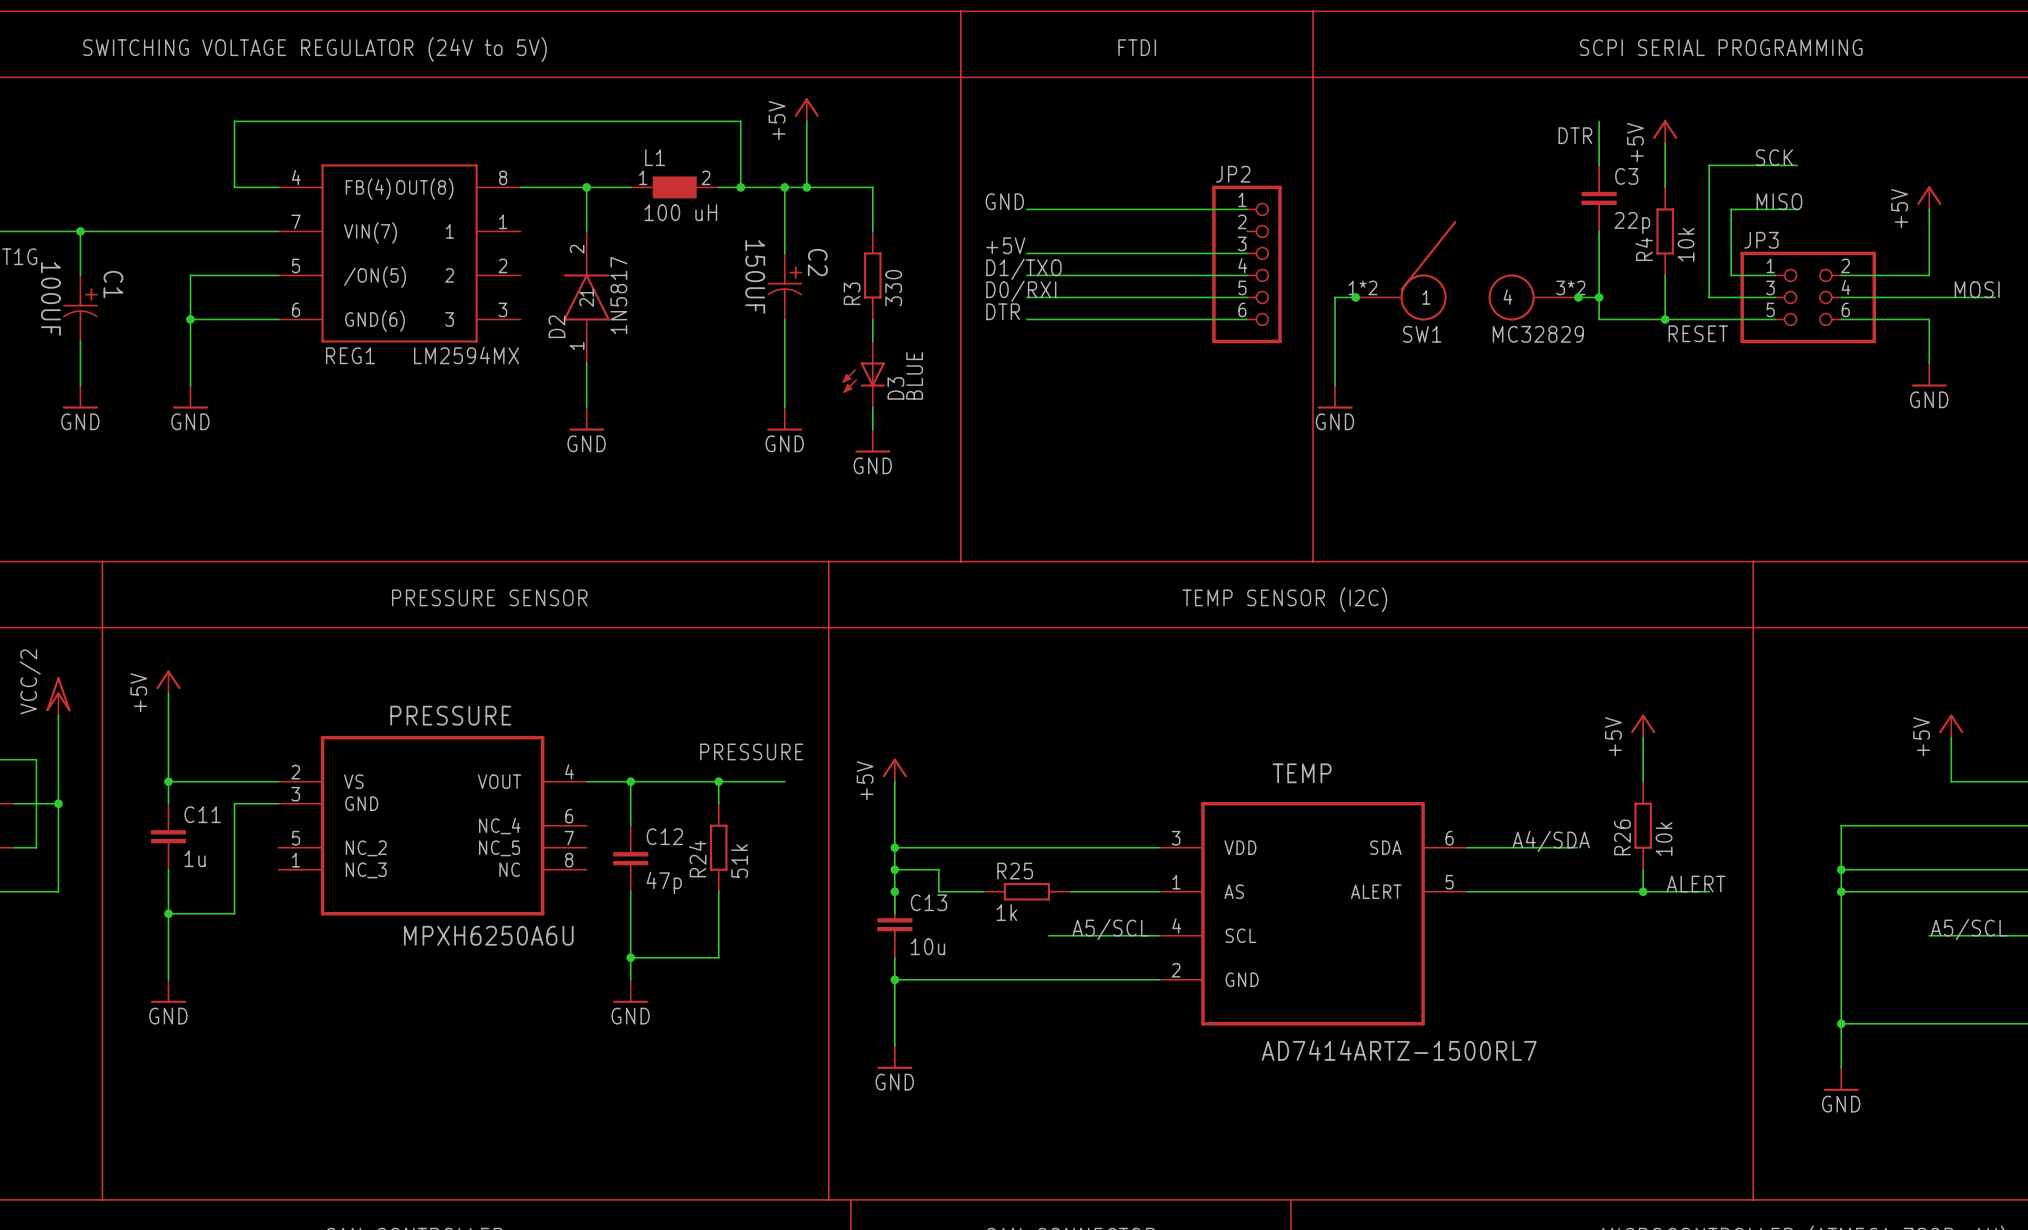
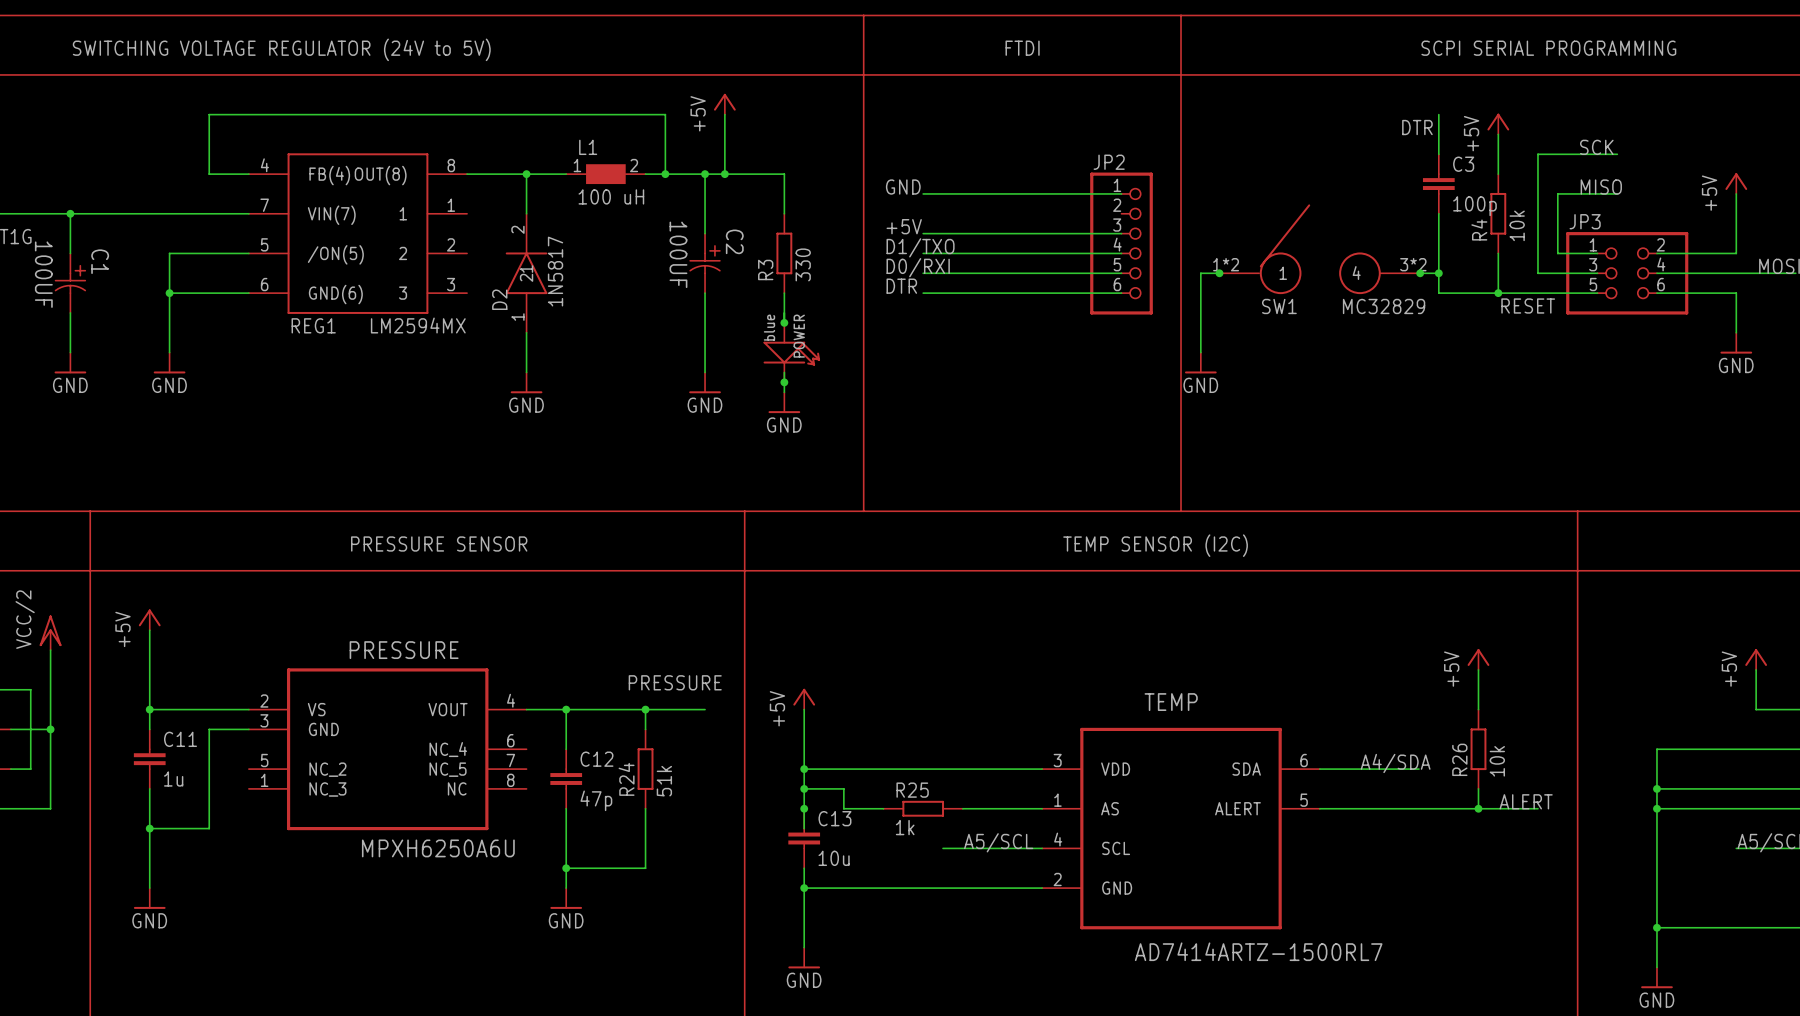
C3 value: 22p (1632, 222) -> 100p (1474, 206)
C2 value: 150UF (755, 276) -> 100UF (678, 254)
junction: none -> (784, 322)
D3: BLUE (863, 374) -> none
POWER: none -> blue (791, 352)
junction: none -> (784, 382)

